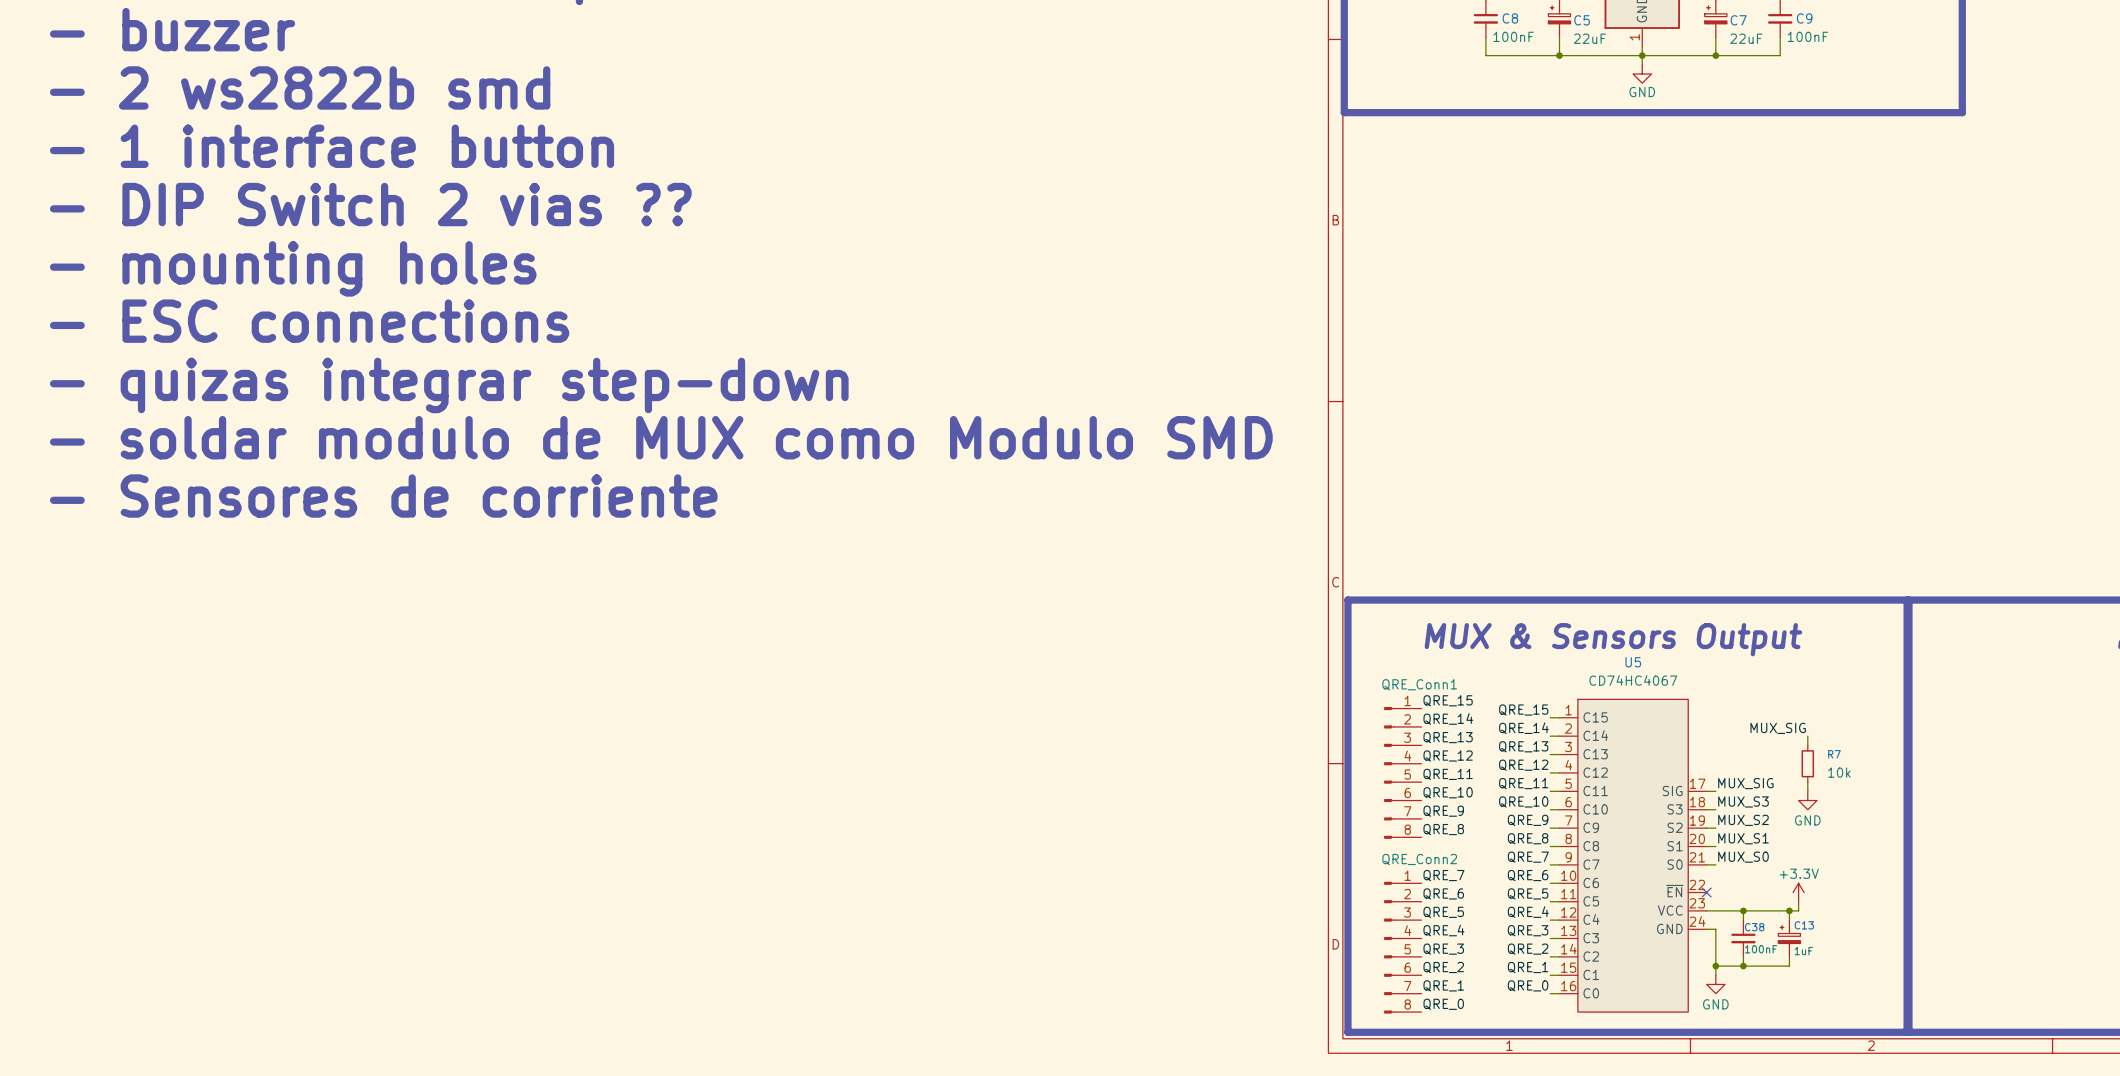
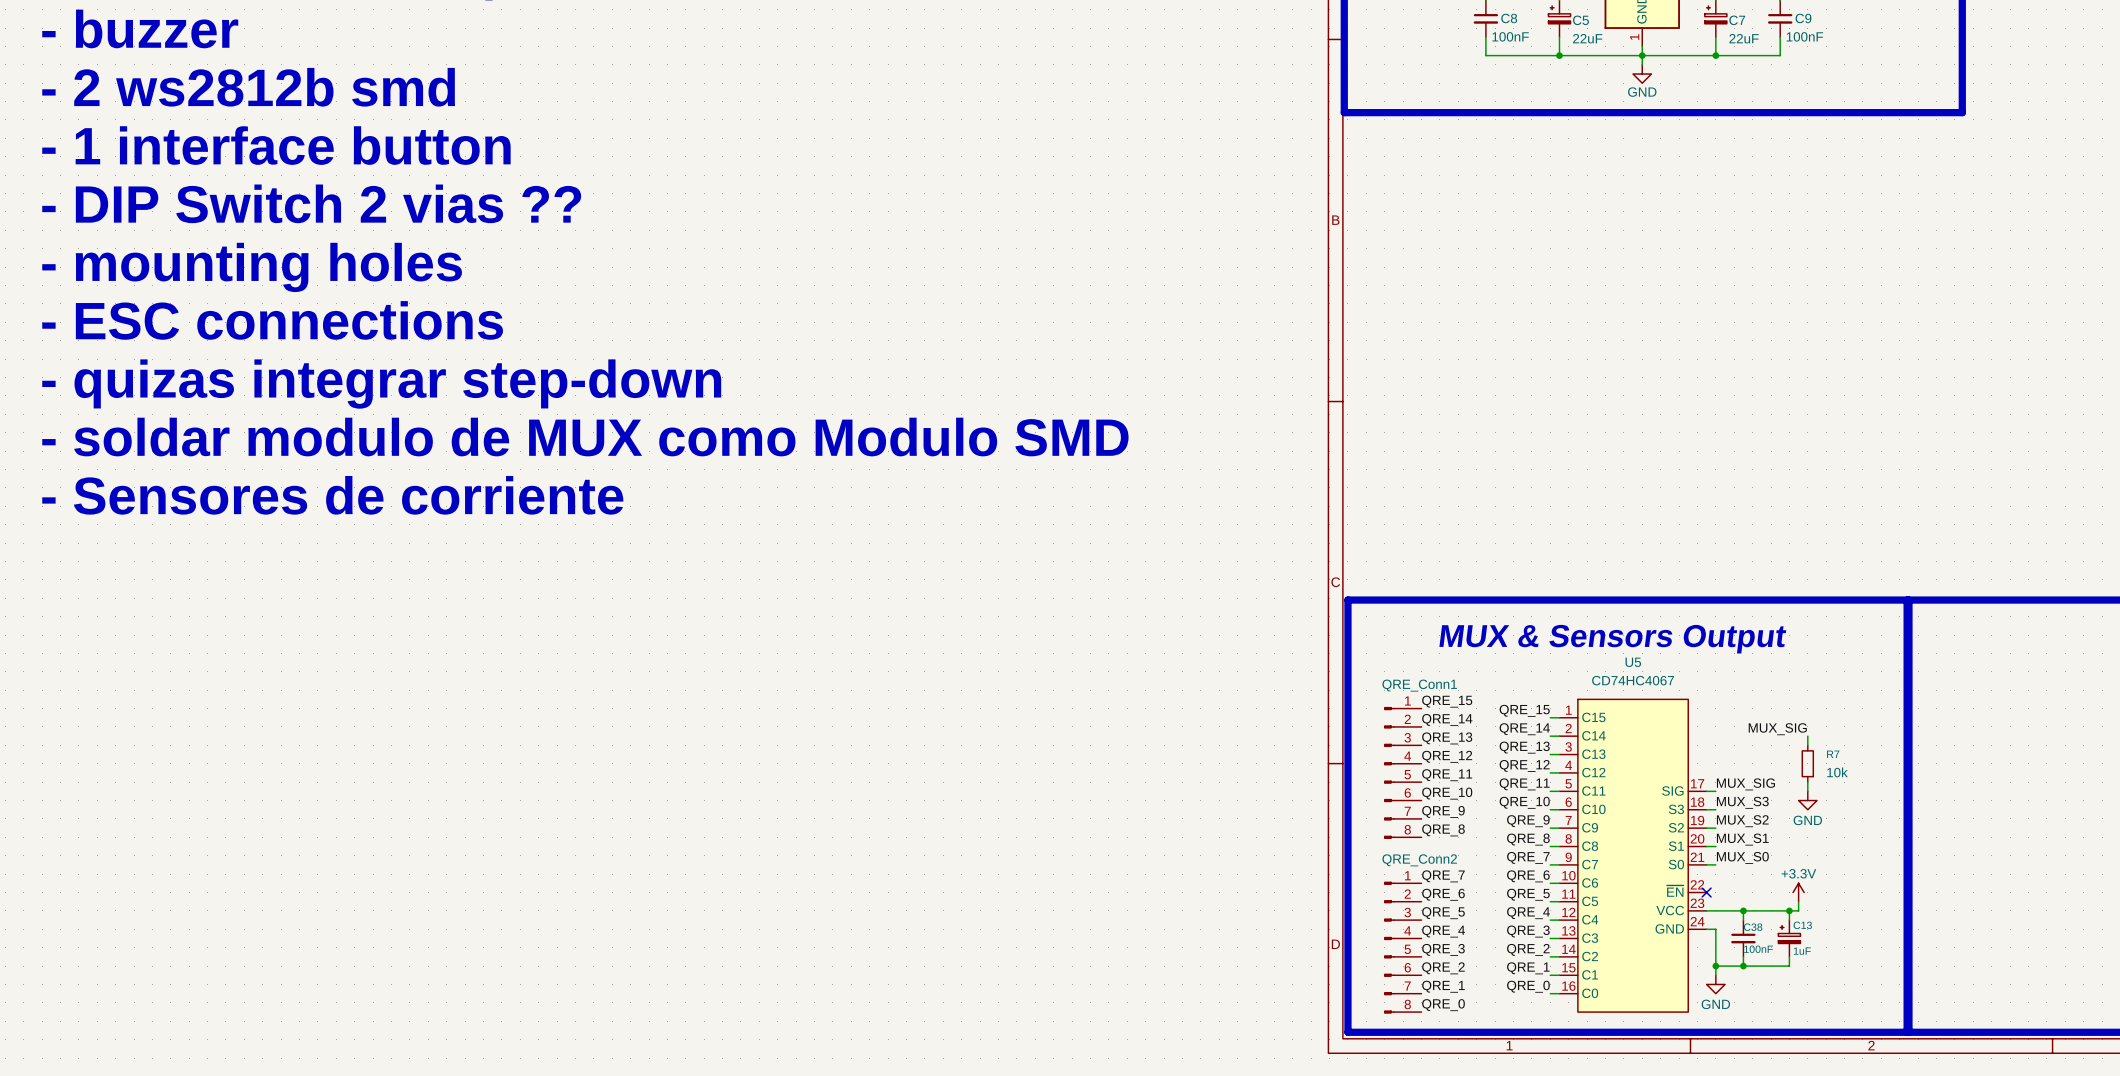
text: - 2 ws2822b smd (300, 87) -> - 2 ws2812b smd (248, 87)

